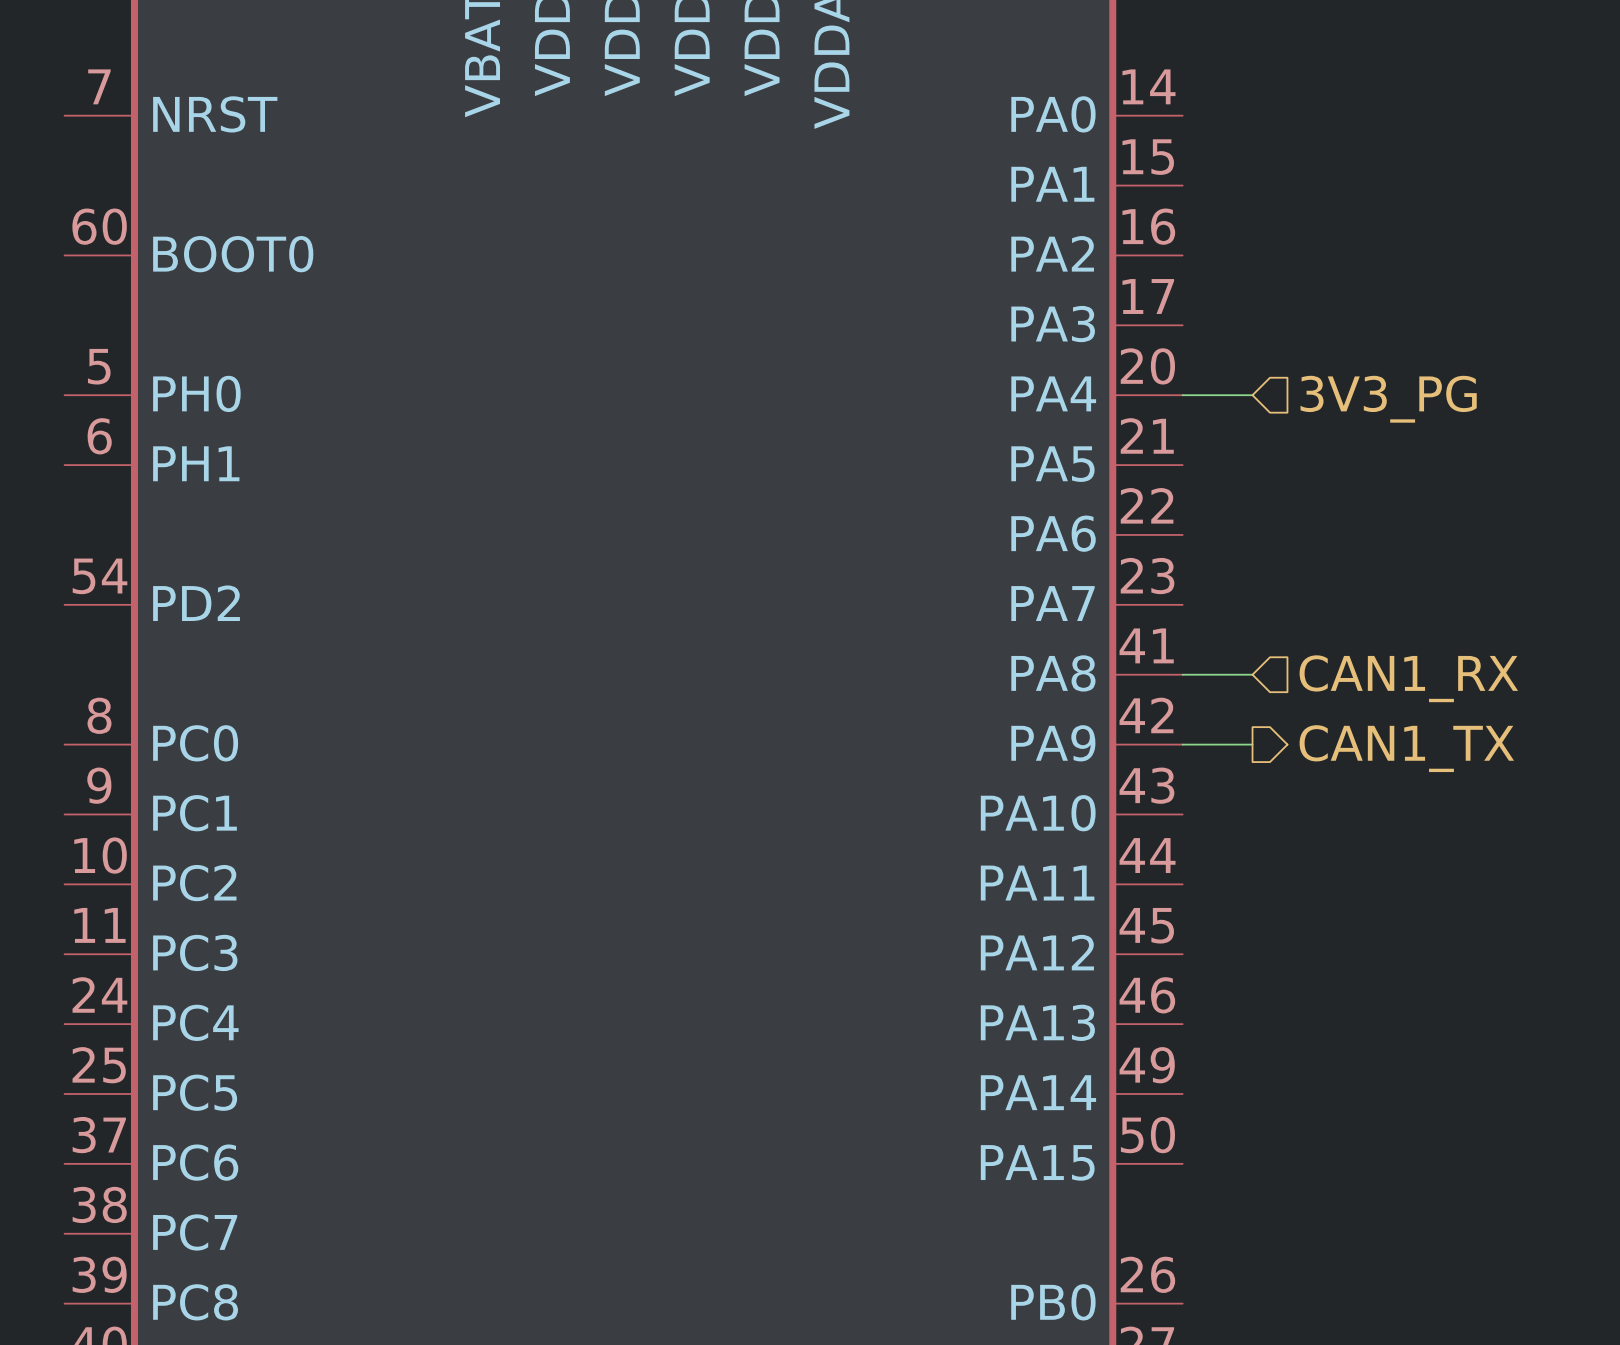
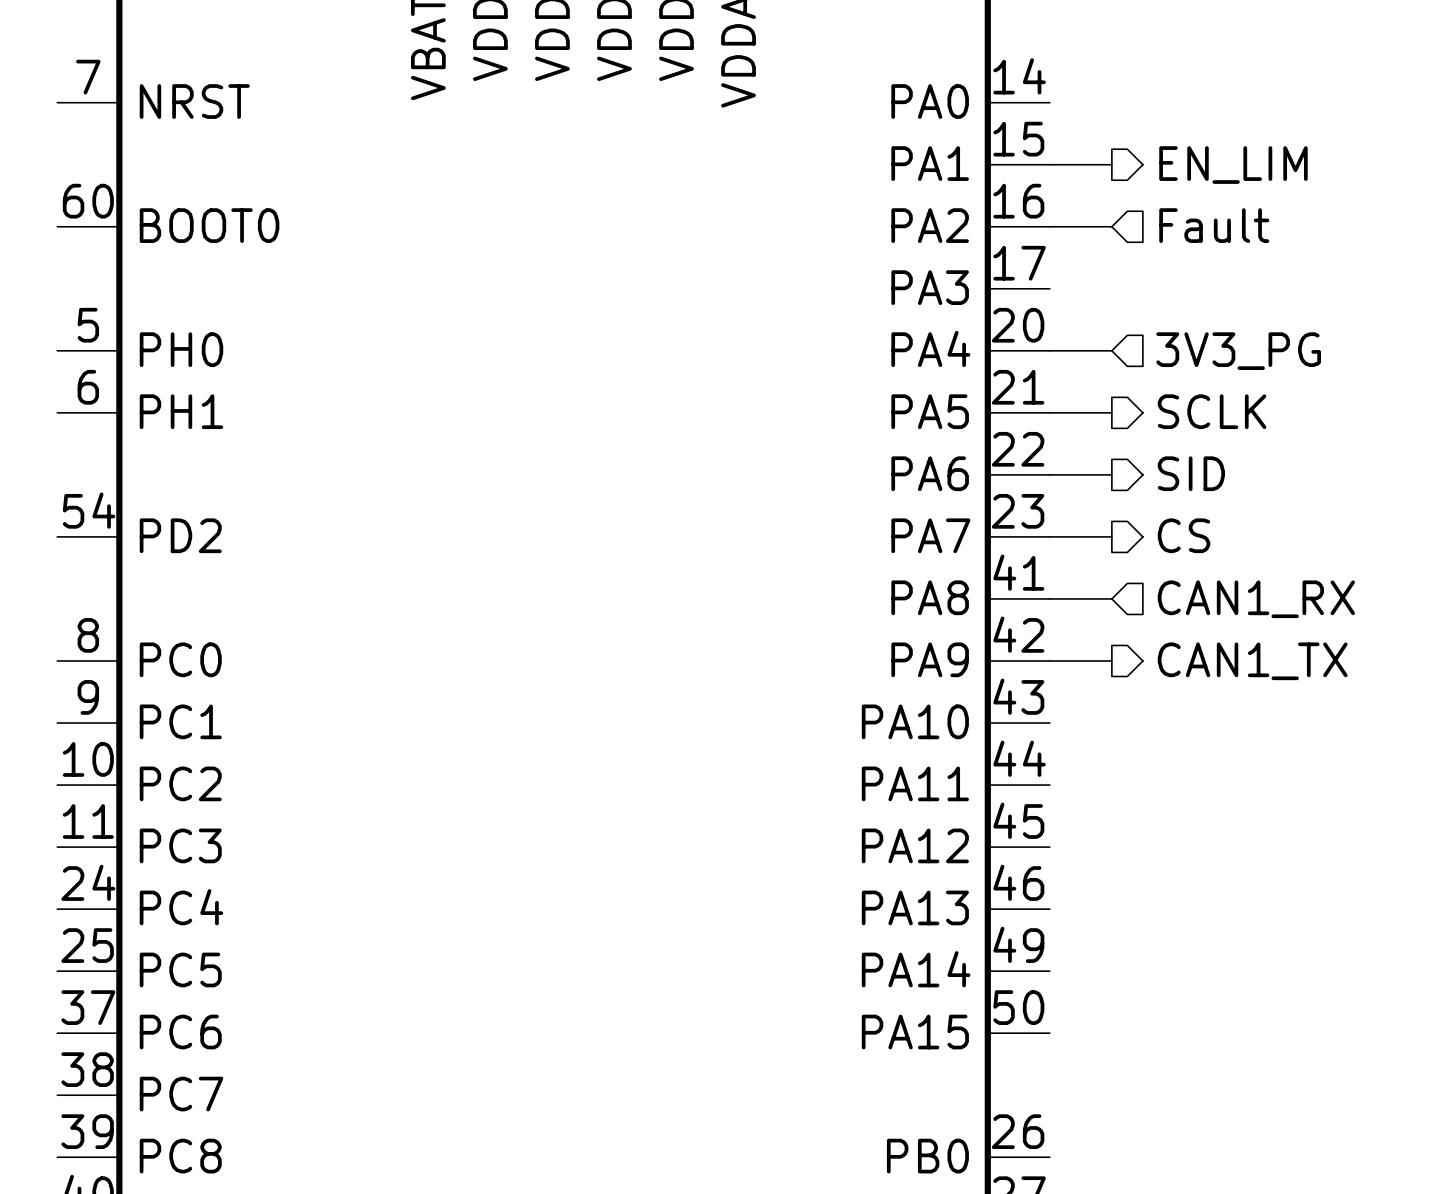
wire: none -> (1049, 164) (1111, 164)
hierarchical label: none -> EN_LIM (1233, 165)
hierarchical label: none -> Fault (1214, 225)
wire: none -> (1049, 226) (1111, 226)
hierarchical label: none -> SCLK (1212, 411)
wire: none -> (1049, 412) (1111, 412)
hierarchical label: none -> SID (1191, 473)
wire: none -> (1049, 474) (1111, 474)
hierarchical label: none -> CS (1183, 535)
wire: none -> (1049, 536) (1111, 536)

